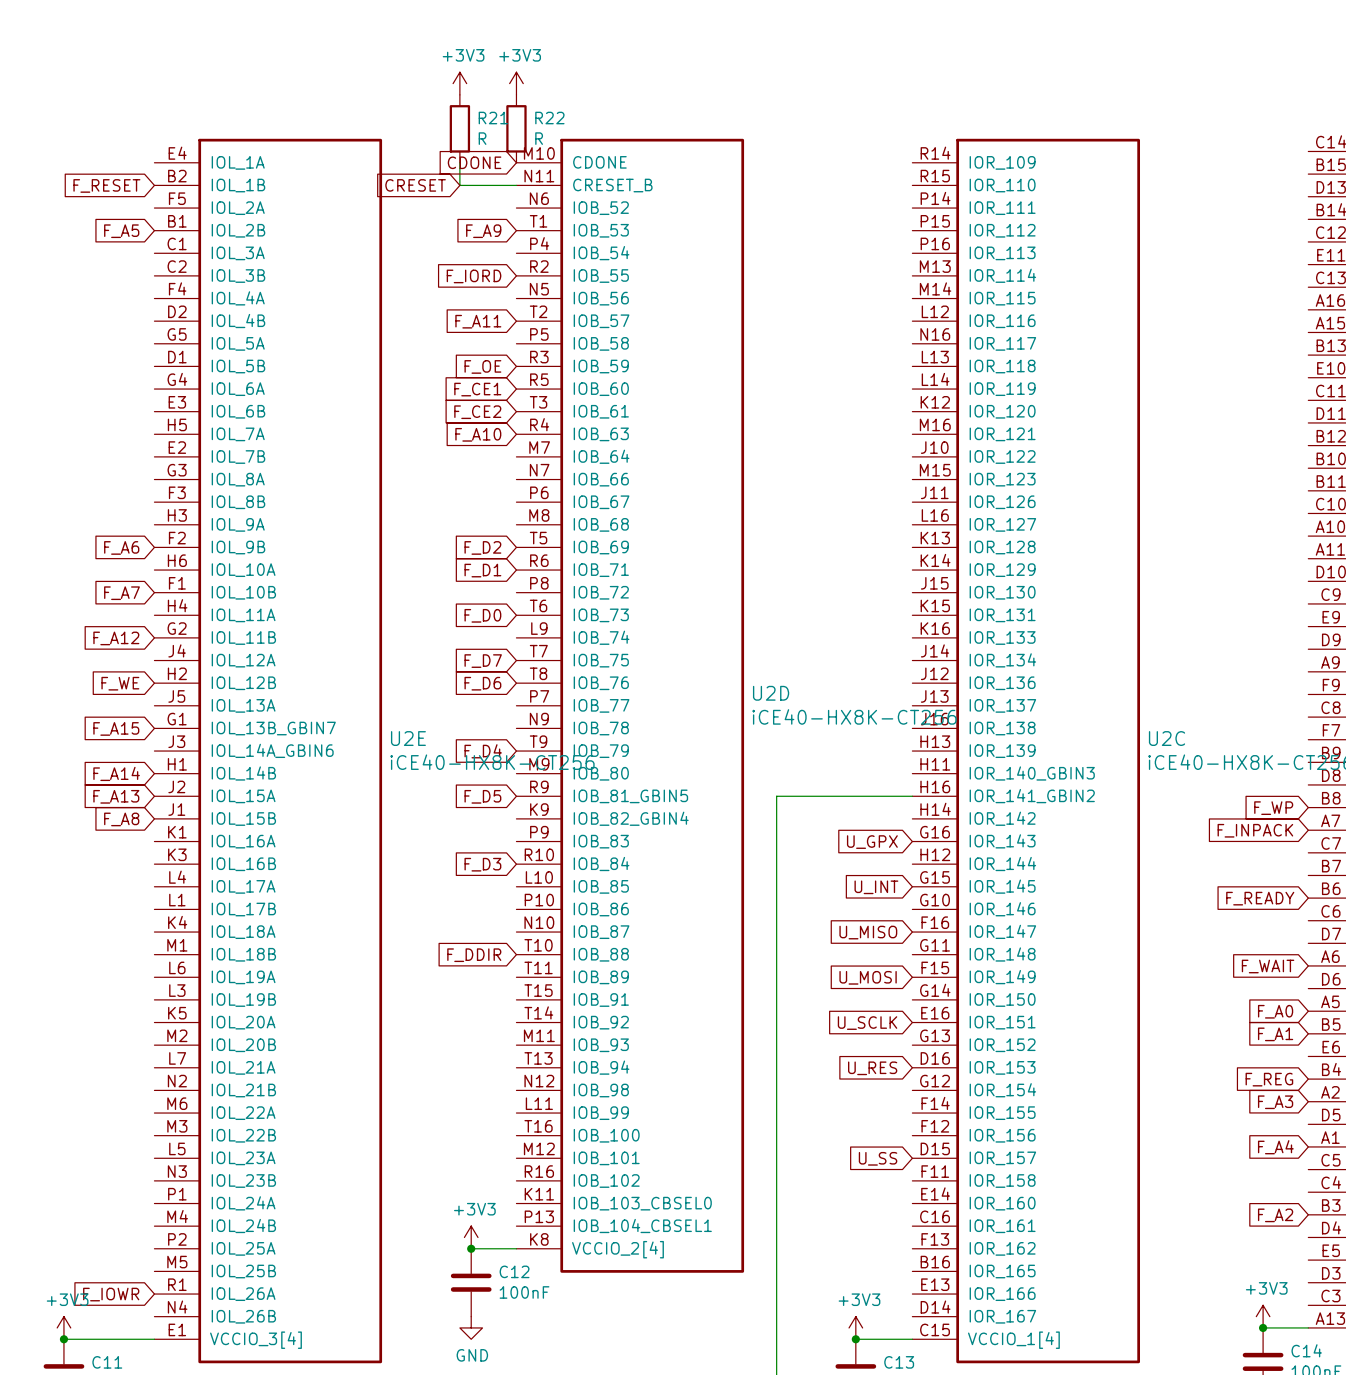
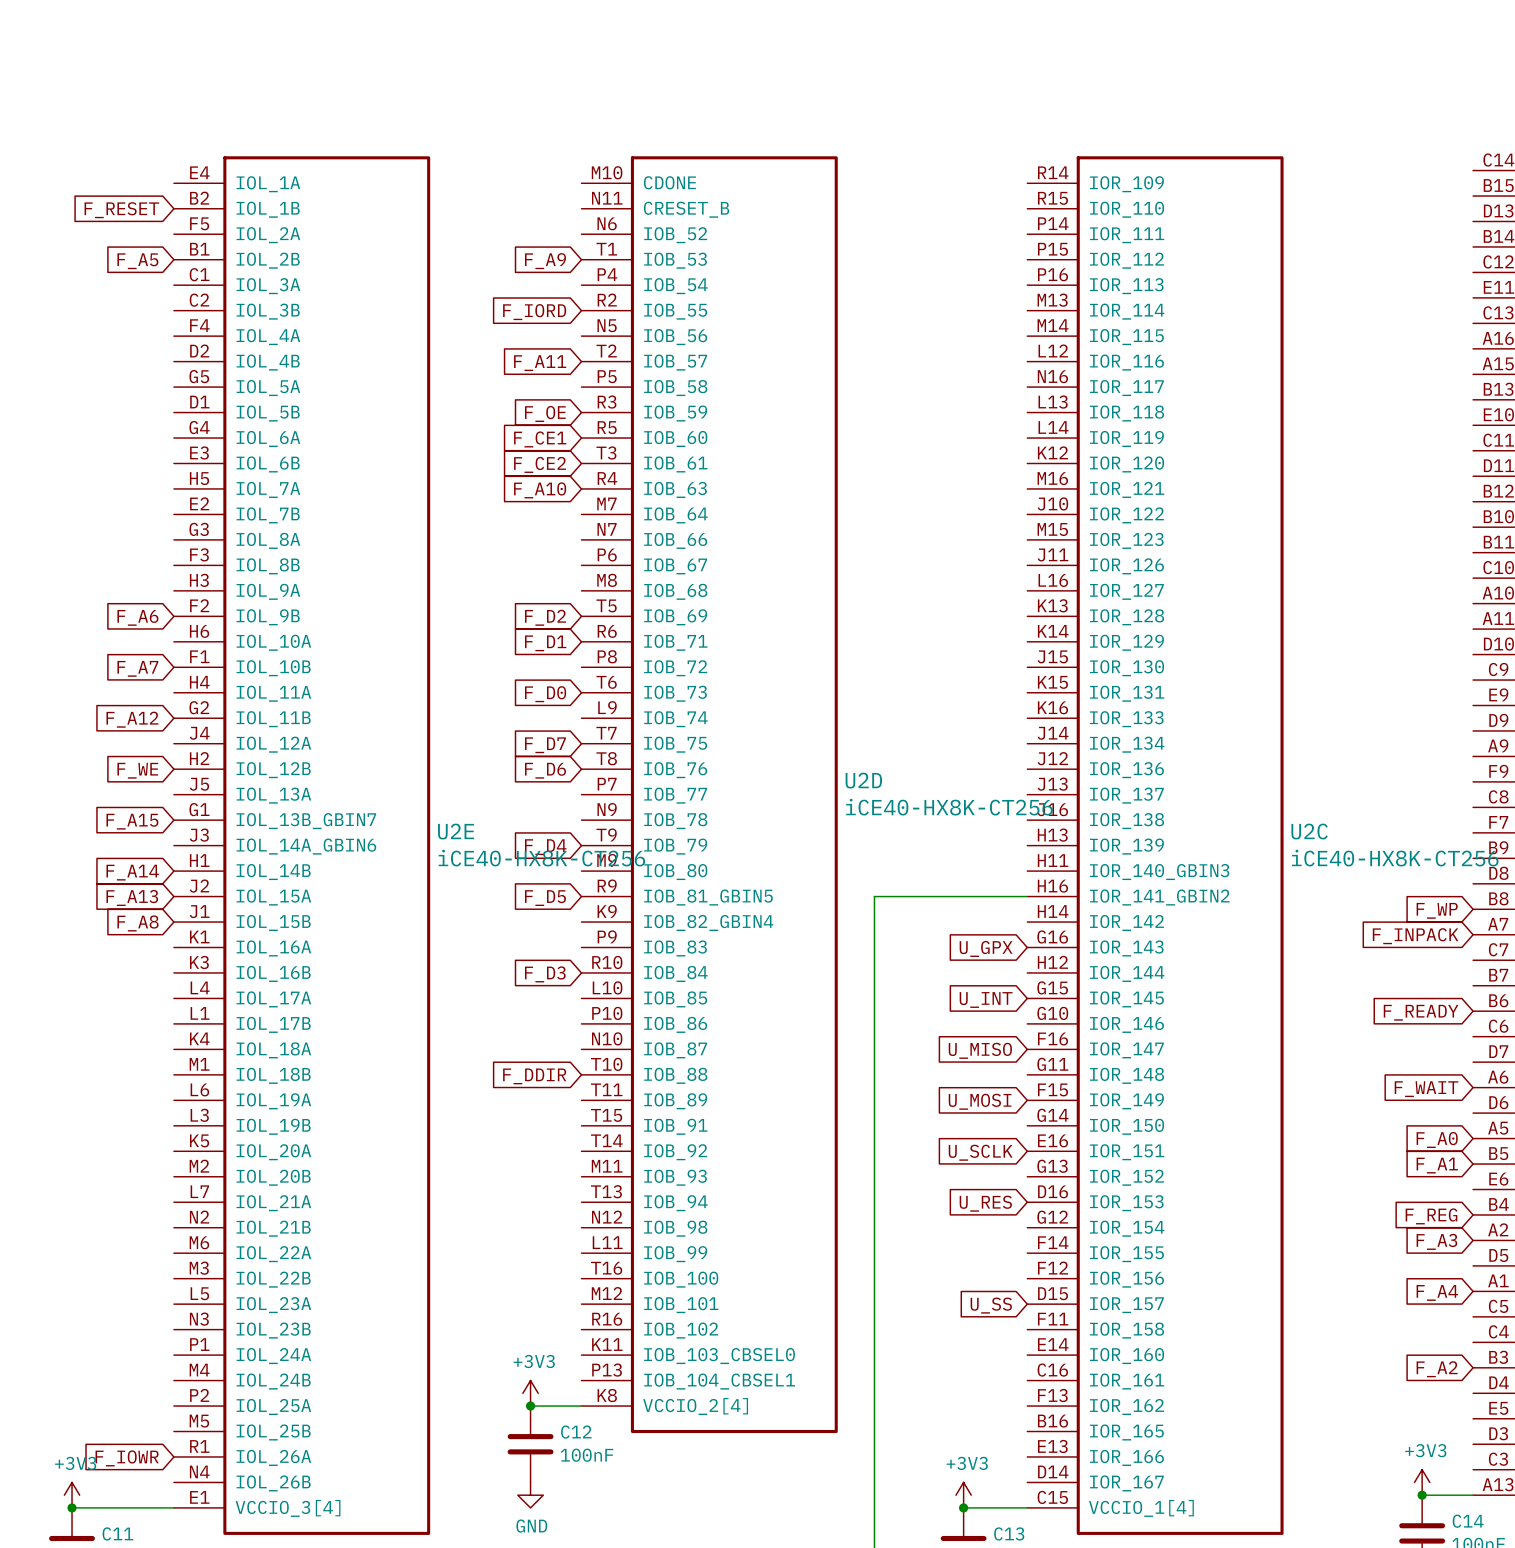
power symbol: +3V3 (459, 83) -> none
power symbol: +3V3 (516, 83) -> none
R21: R (459, 128) -> none
R22: R (516, 128) -> none
wire: (459, 162) (459, 185) (516, 185) -> none
global label: CDONE (474, 162) -> none
global label: CRESET (415, 185) -> none

